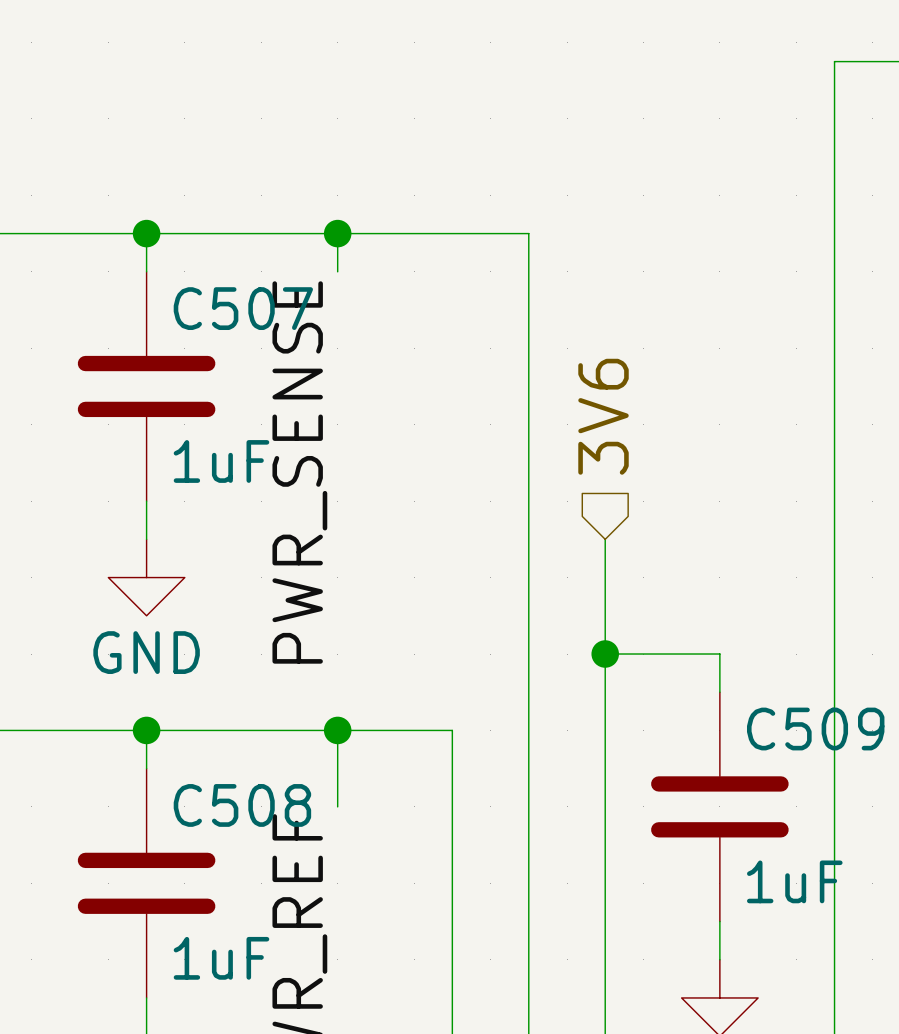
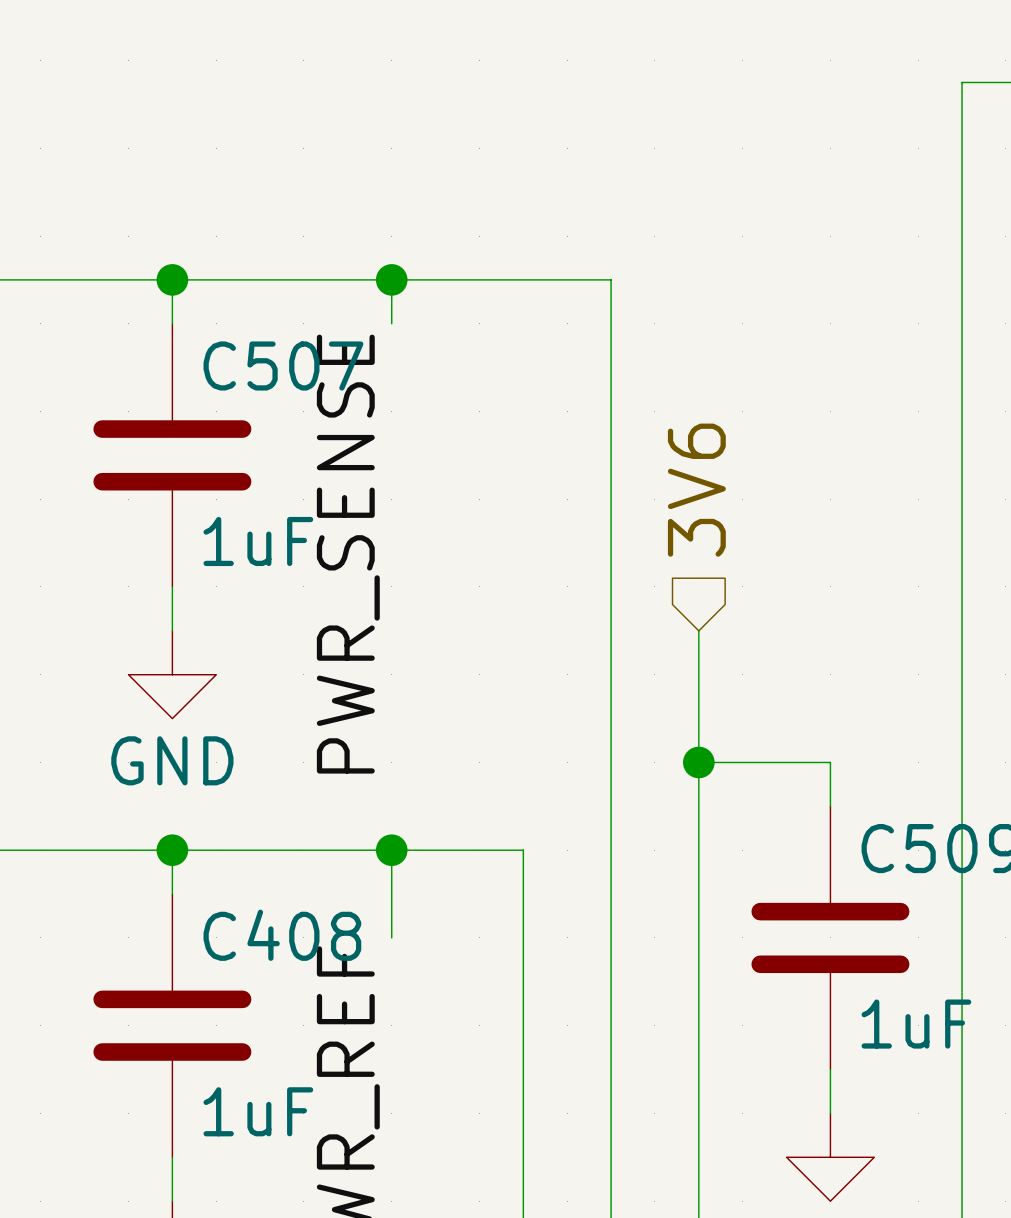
C508 name: C508 (242, 805) -> C408 (282, 935)

